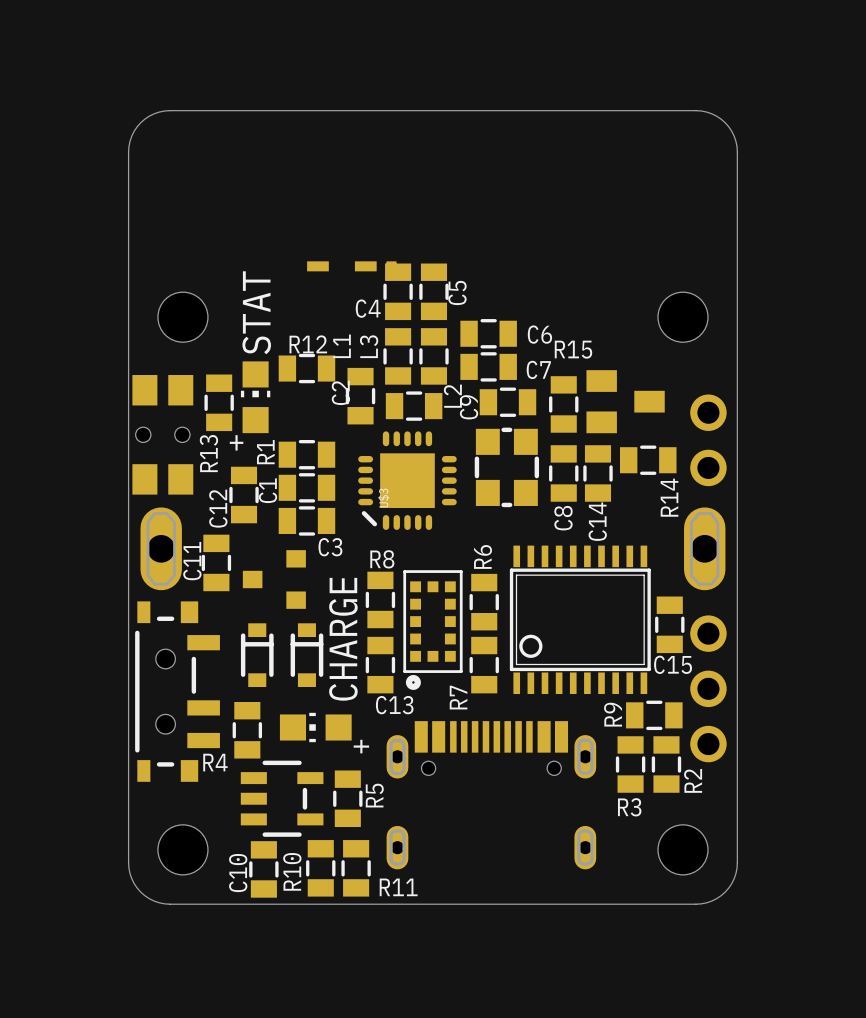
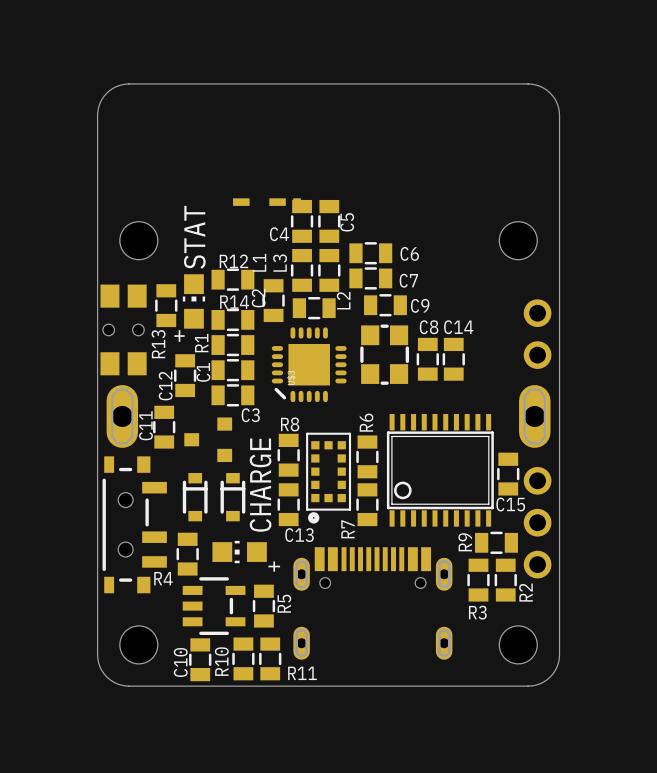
part: (625, 401) -> none
R15: (563, 404) -> none
C9 name rotation: 0° (469, 407) -> 90° clockwise (420, 305)
C9 name position: C9 (469, 407) -> C9 (420, 305)
R14 position: (648, 460) -> (232, 319)
R14 name rotation: 0° (669, 497) -> 90° clockwise (234, 302)
R14 name position: R14 (669, 497) -> R14 (234, 302)
C8 name rotation: 0° (563, 518) -> 90° clockwise (429, 327)
C8 name position: C8 (563, 518) -> C8 (429, 327)
C14 name rotation: 0° (597, 521) -> 90° clockwise (458, 327)
C14 name position: C14 (597, 521) -> C14 (458, 327)

